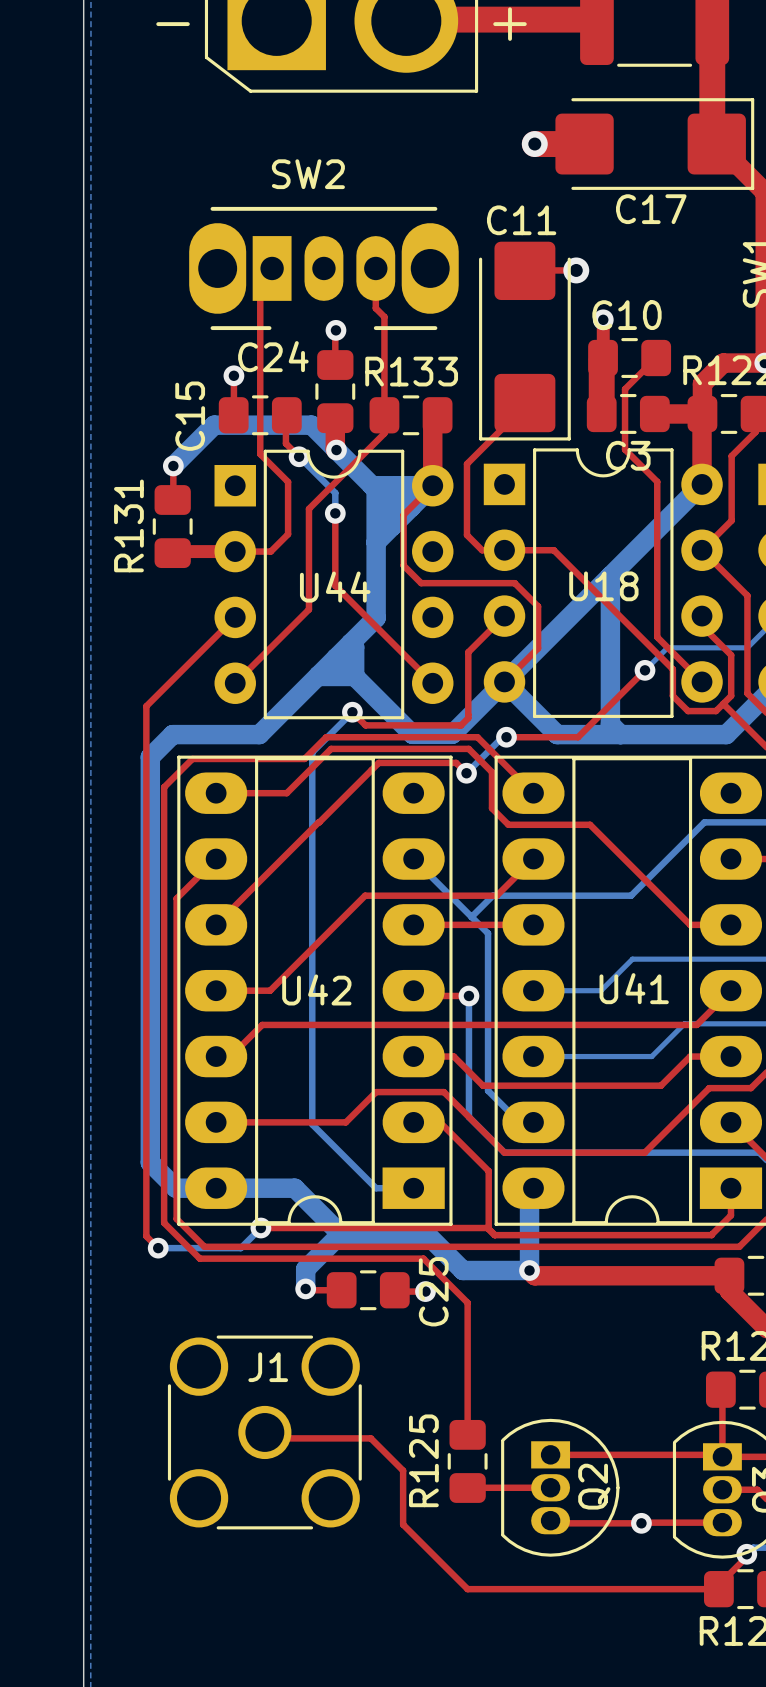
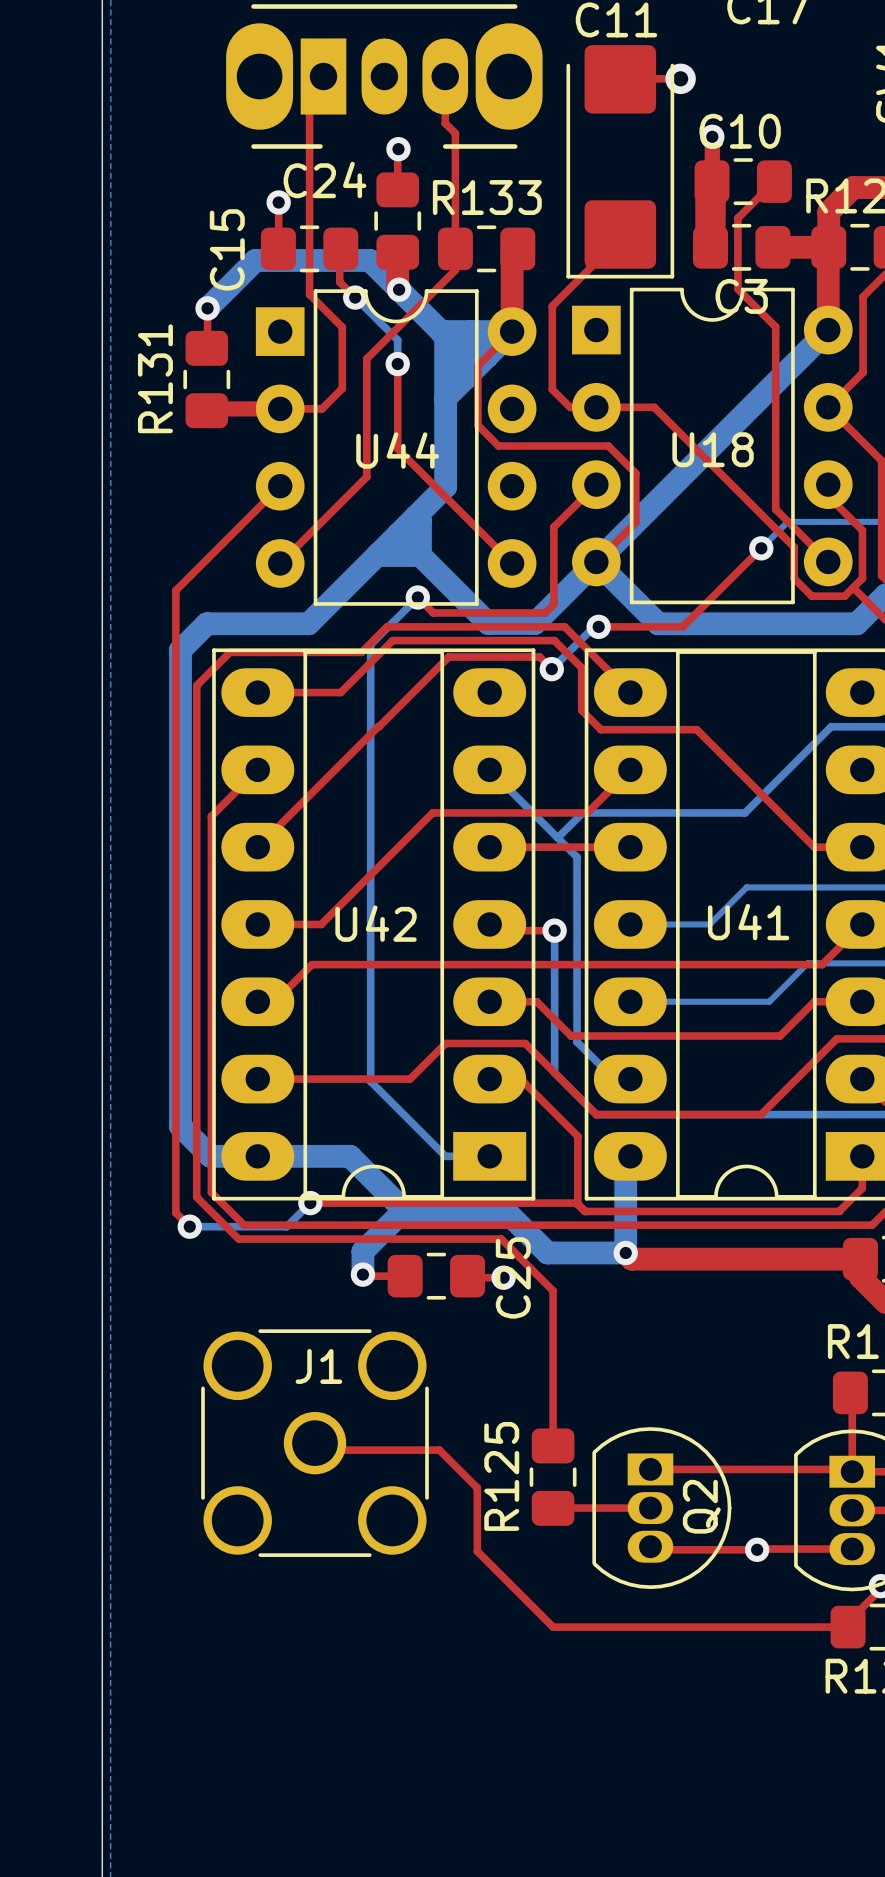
bottom track: (610, 576) (610, 724) (620, 734) -> none

